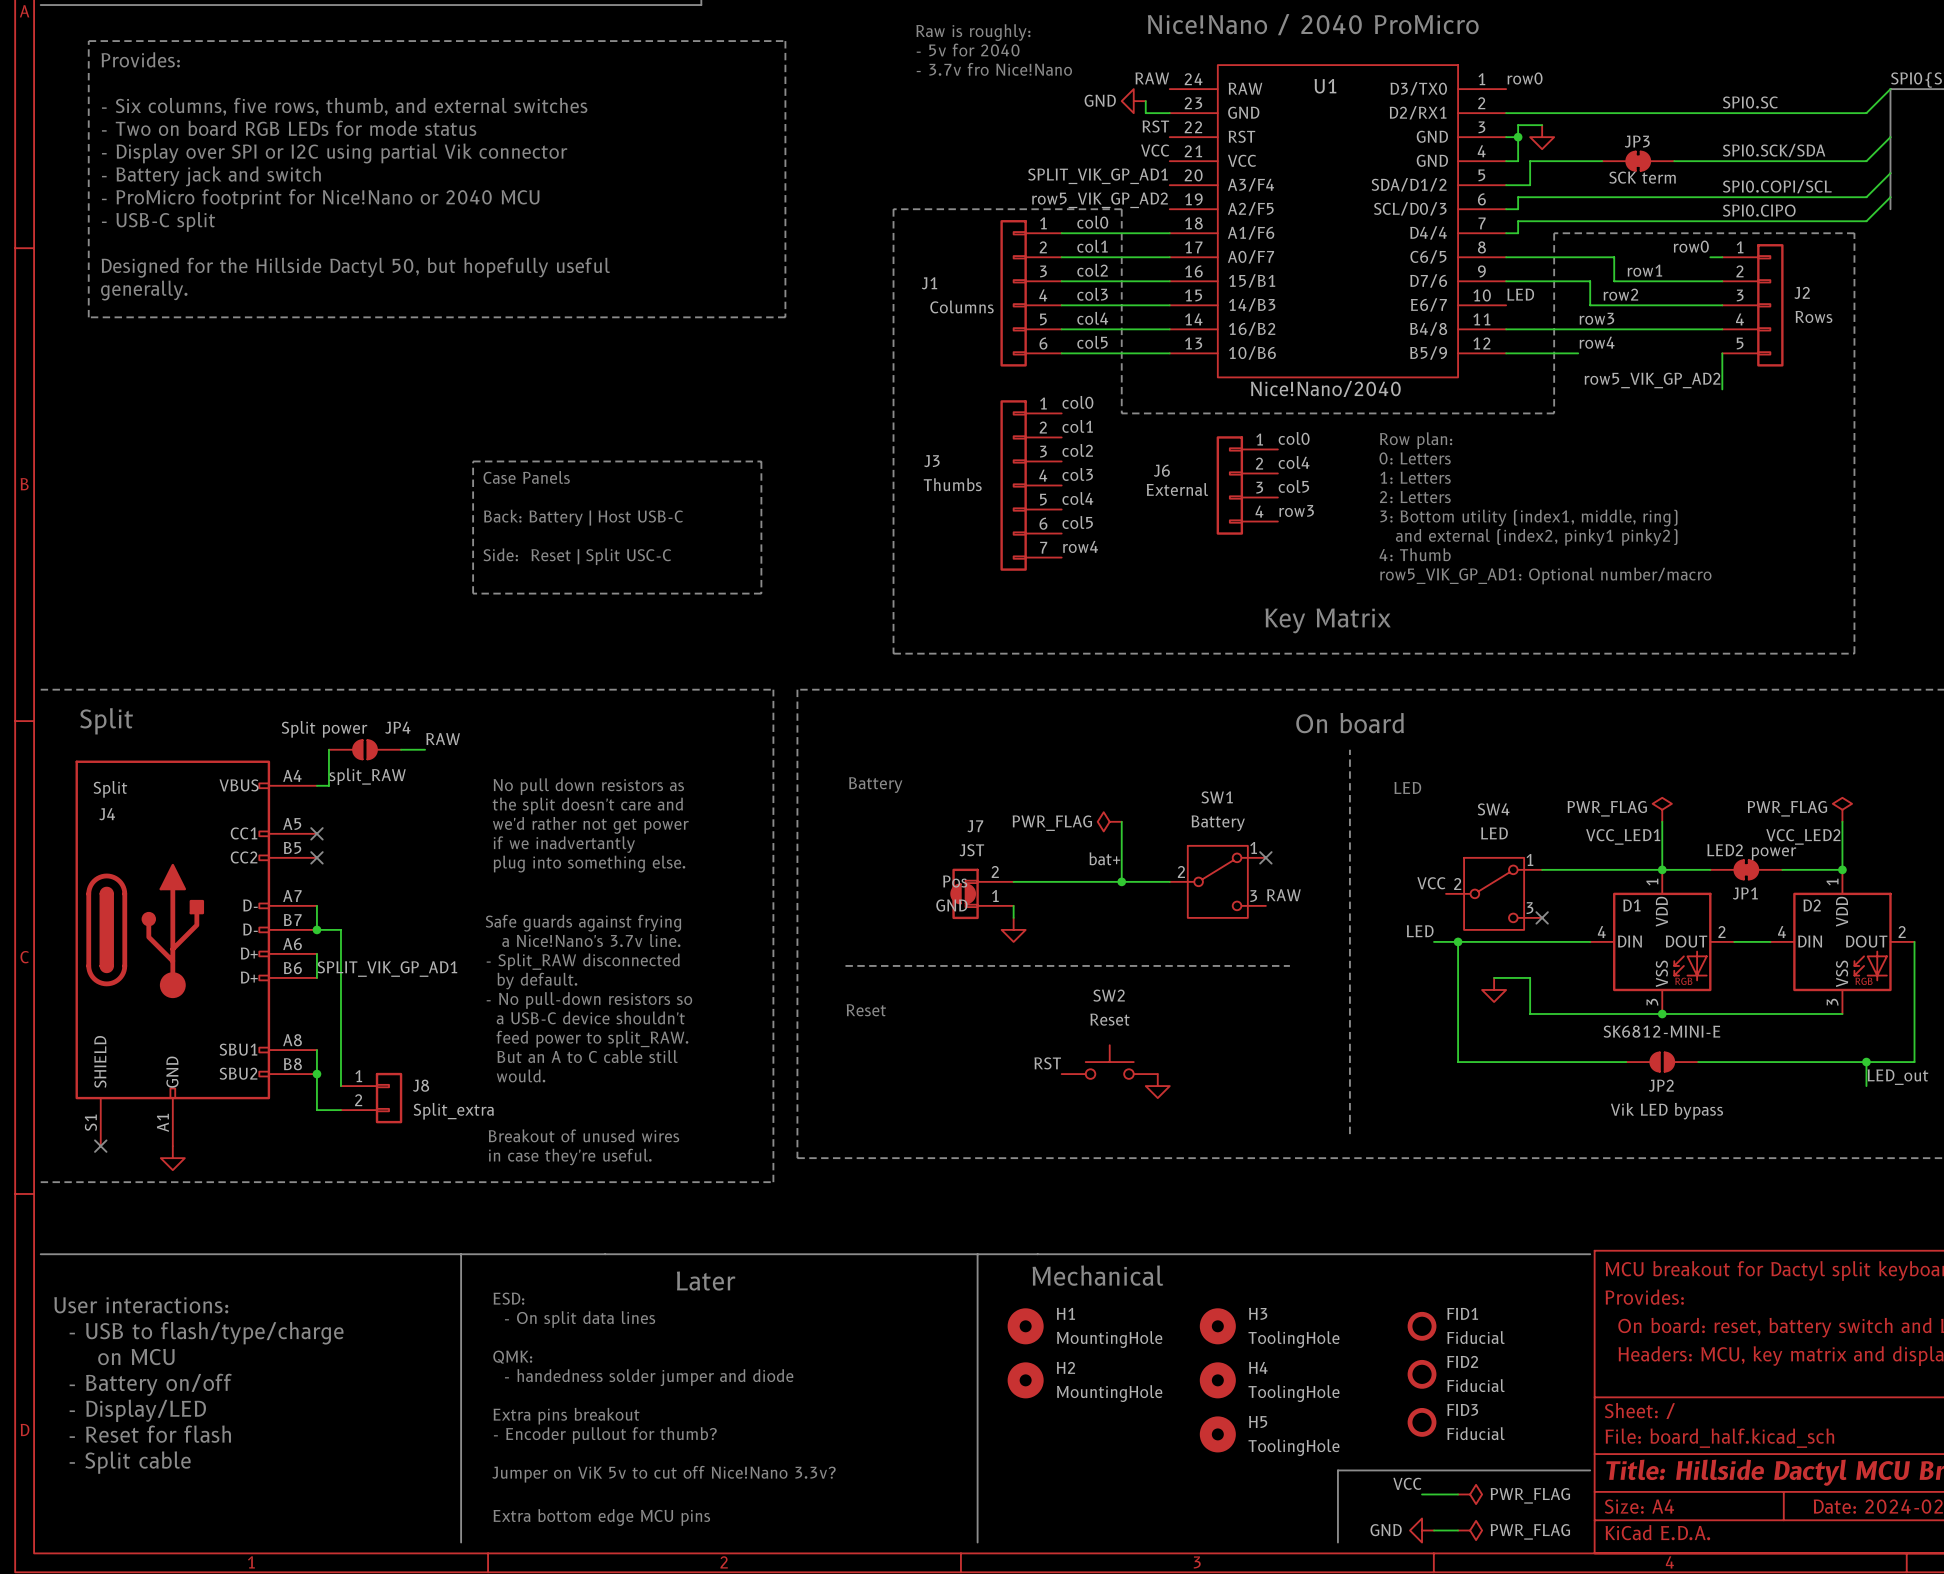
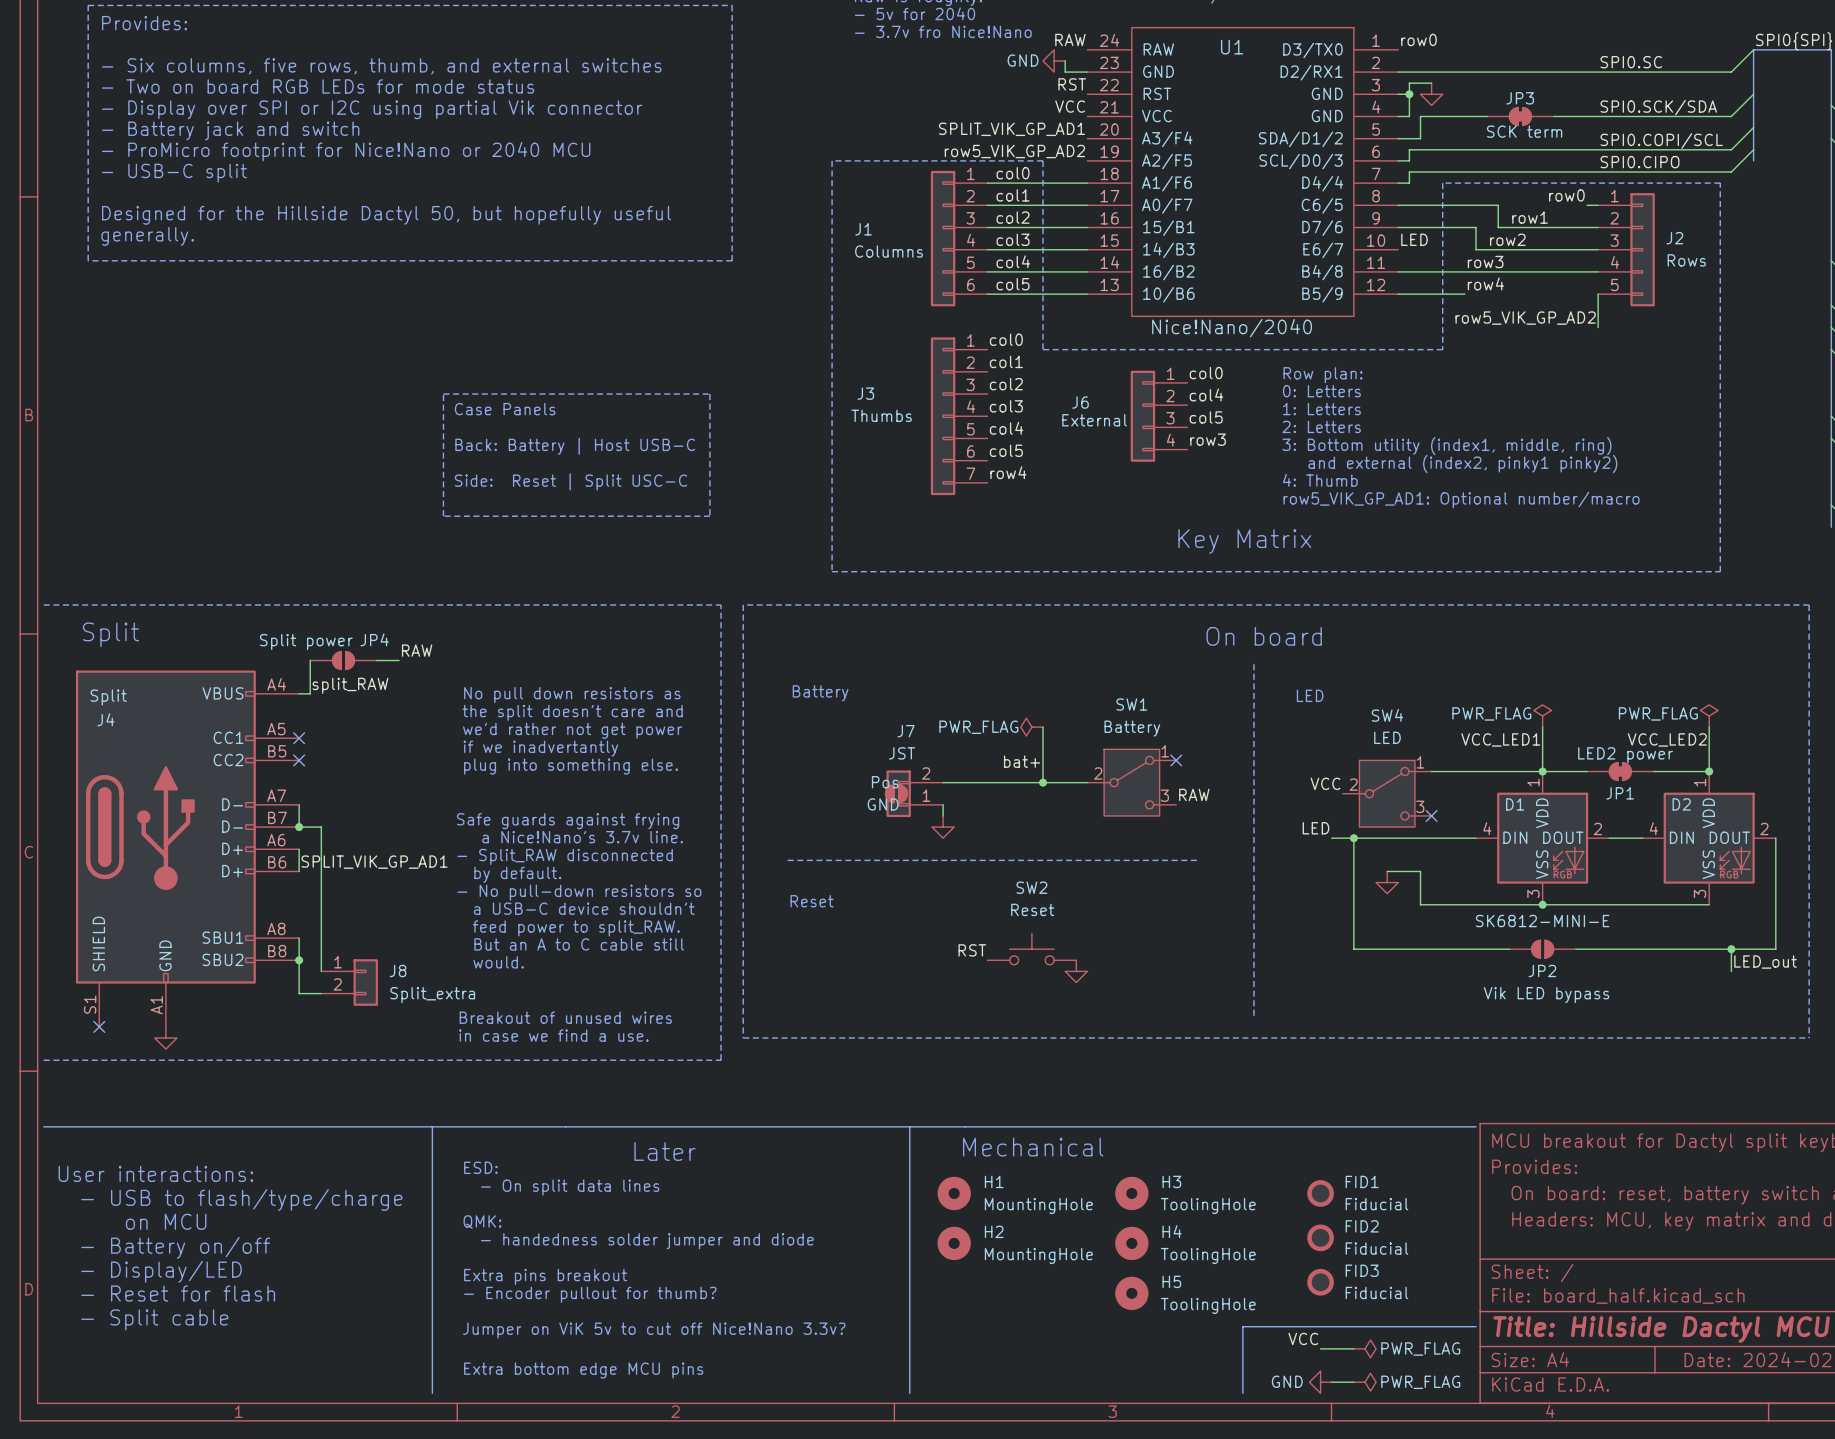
text: in case they're useful. (570, 1157) -> in case we find a use. (553, 1035)

